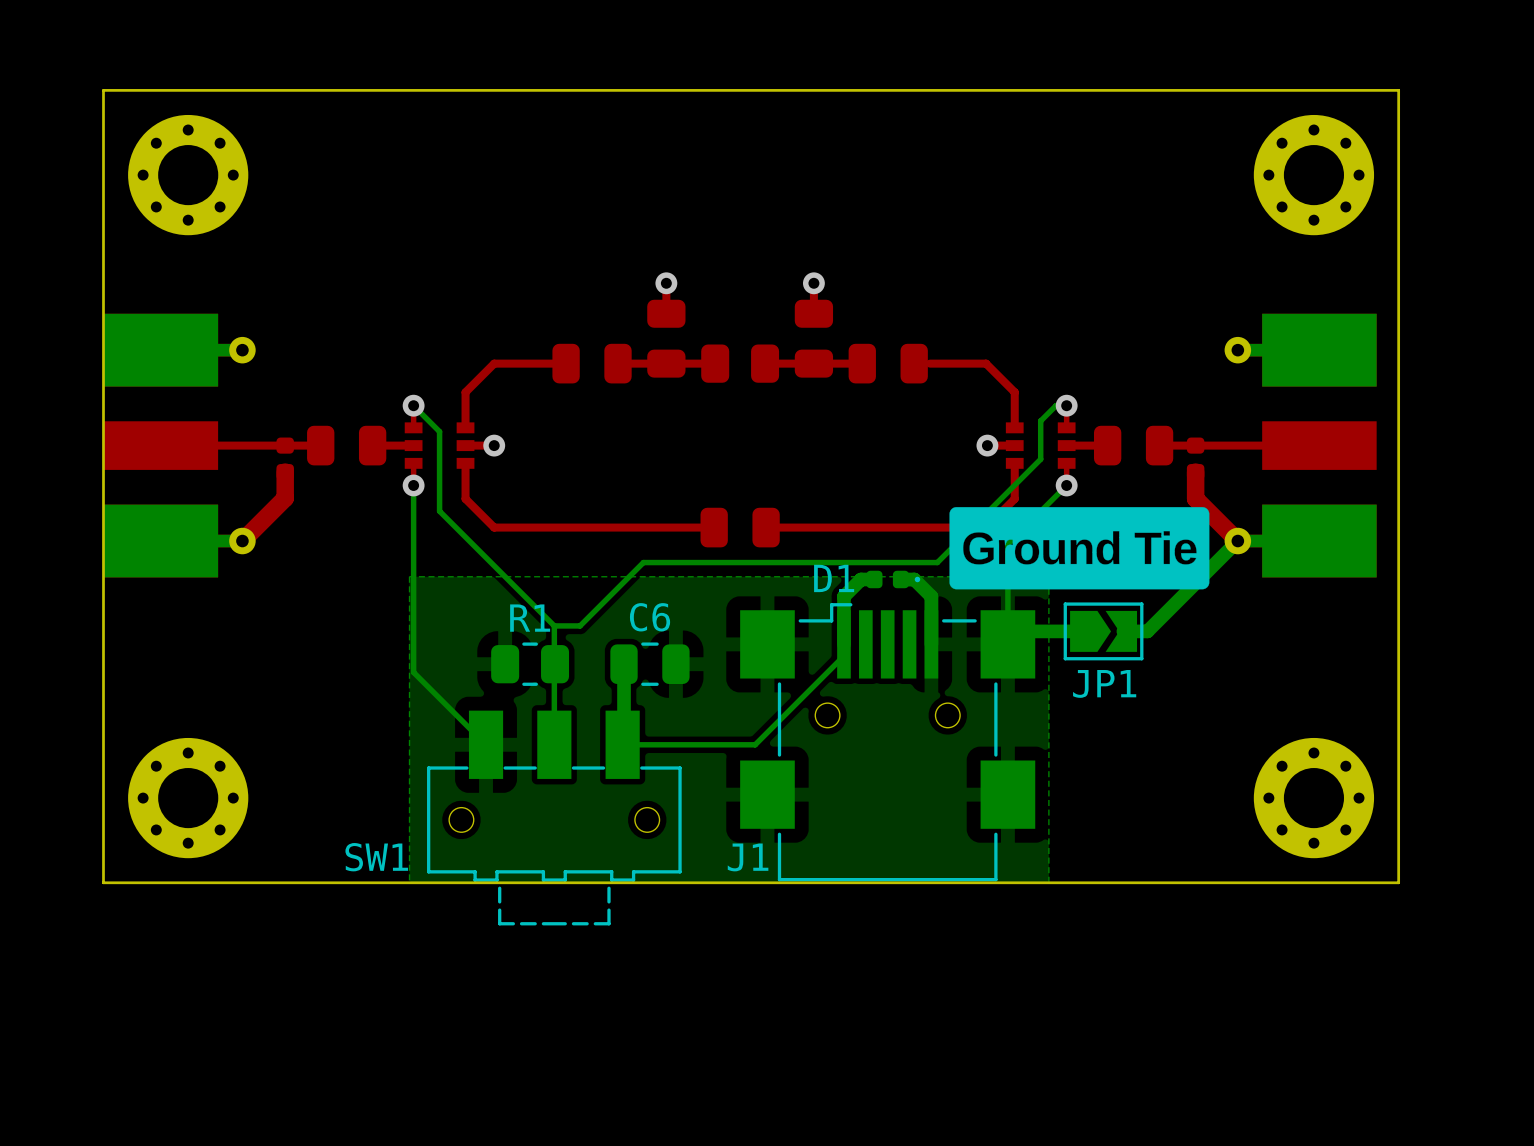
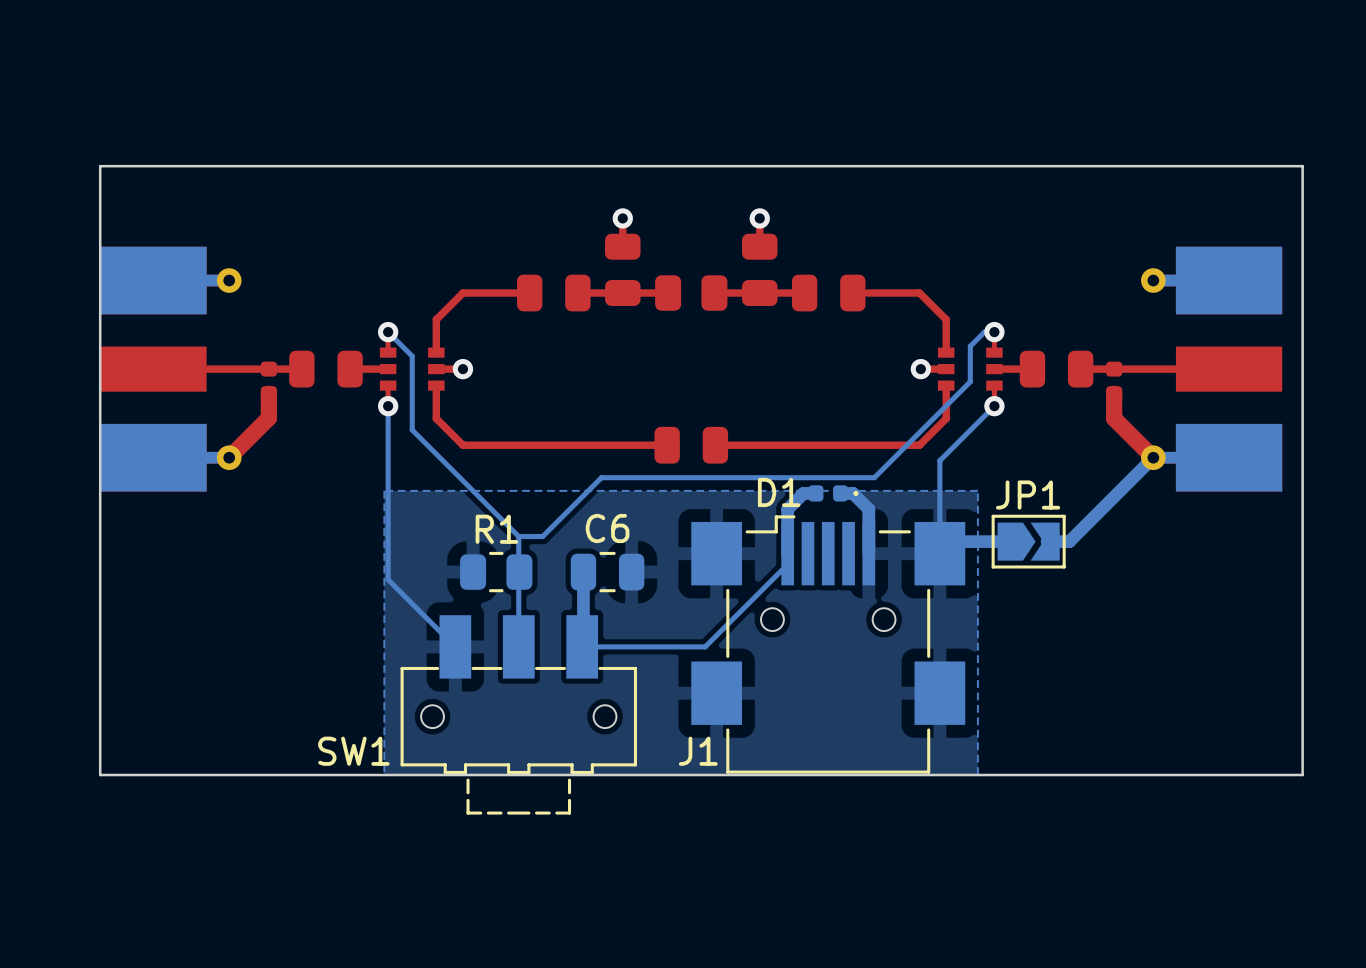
part: (188, 175) -> none
part: (1313, 175) -> none
board edge: (1398, 227) (1398, 90) (103, 90) (103, 227) -> (1302, 166) (100, 166)
drawing: [949, 507, 1210, 590] -> none
JP1 name position: JP1 (1104, 683) -> JP1 (1028, 495)
part: (188, 798) -> none
part: (1313, 798) -> none

